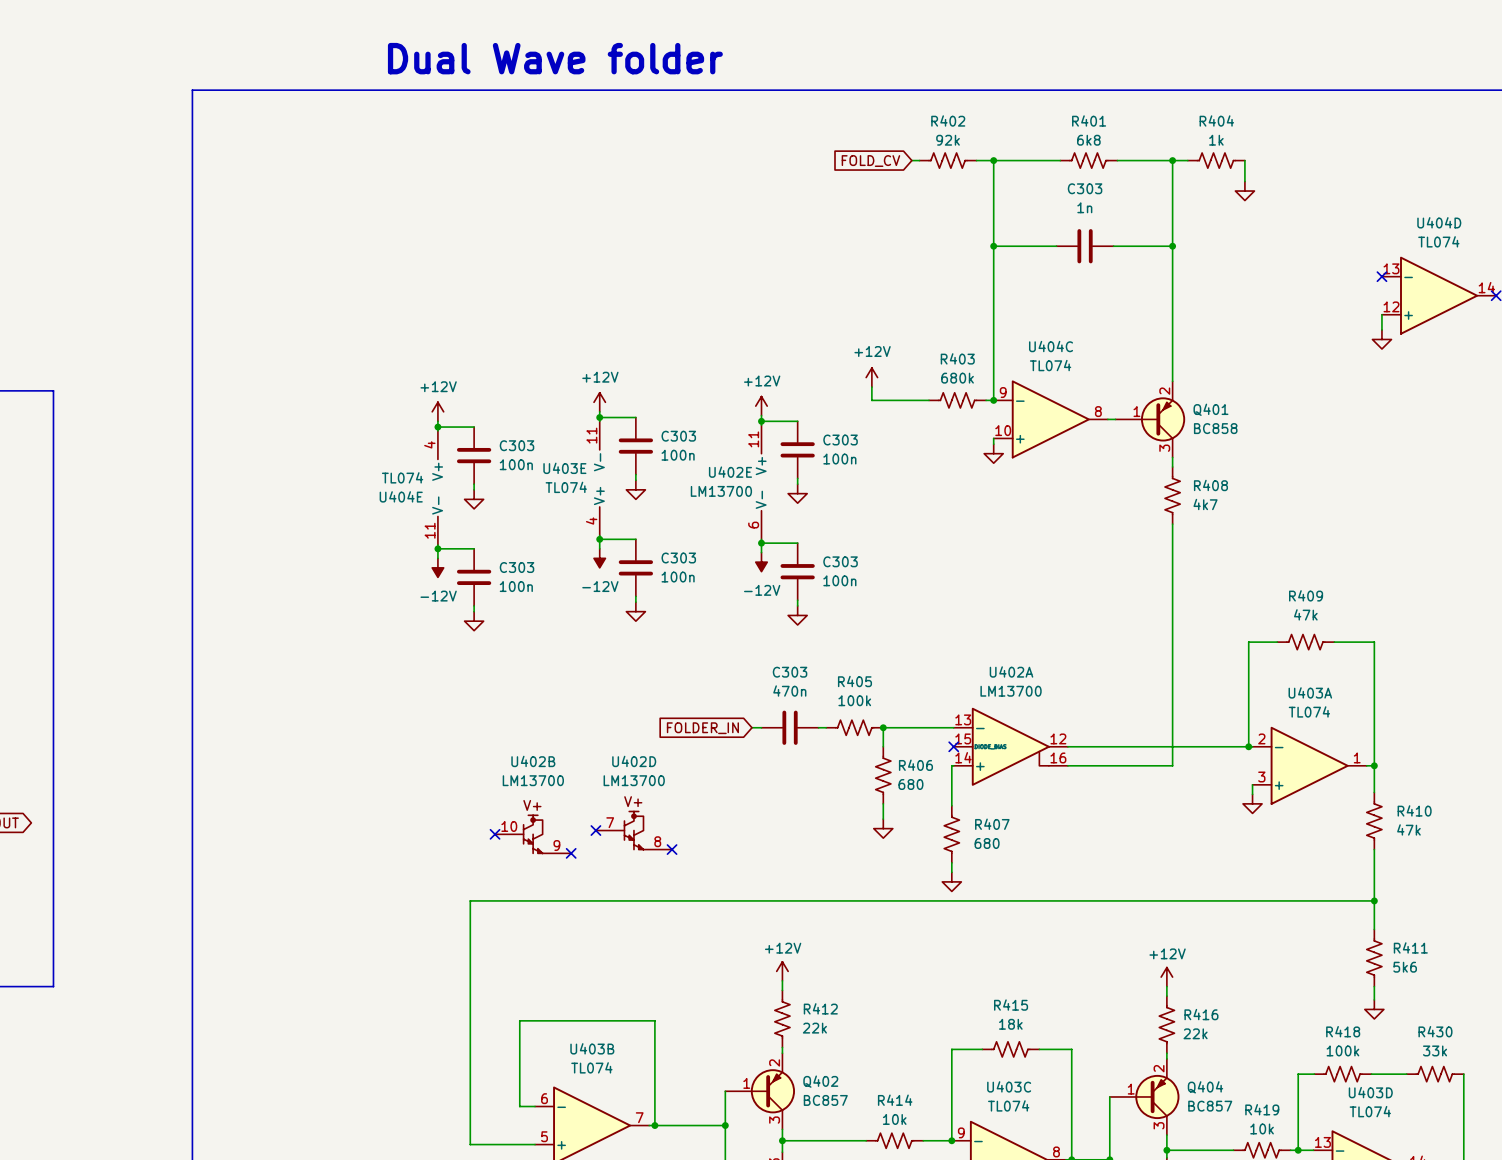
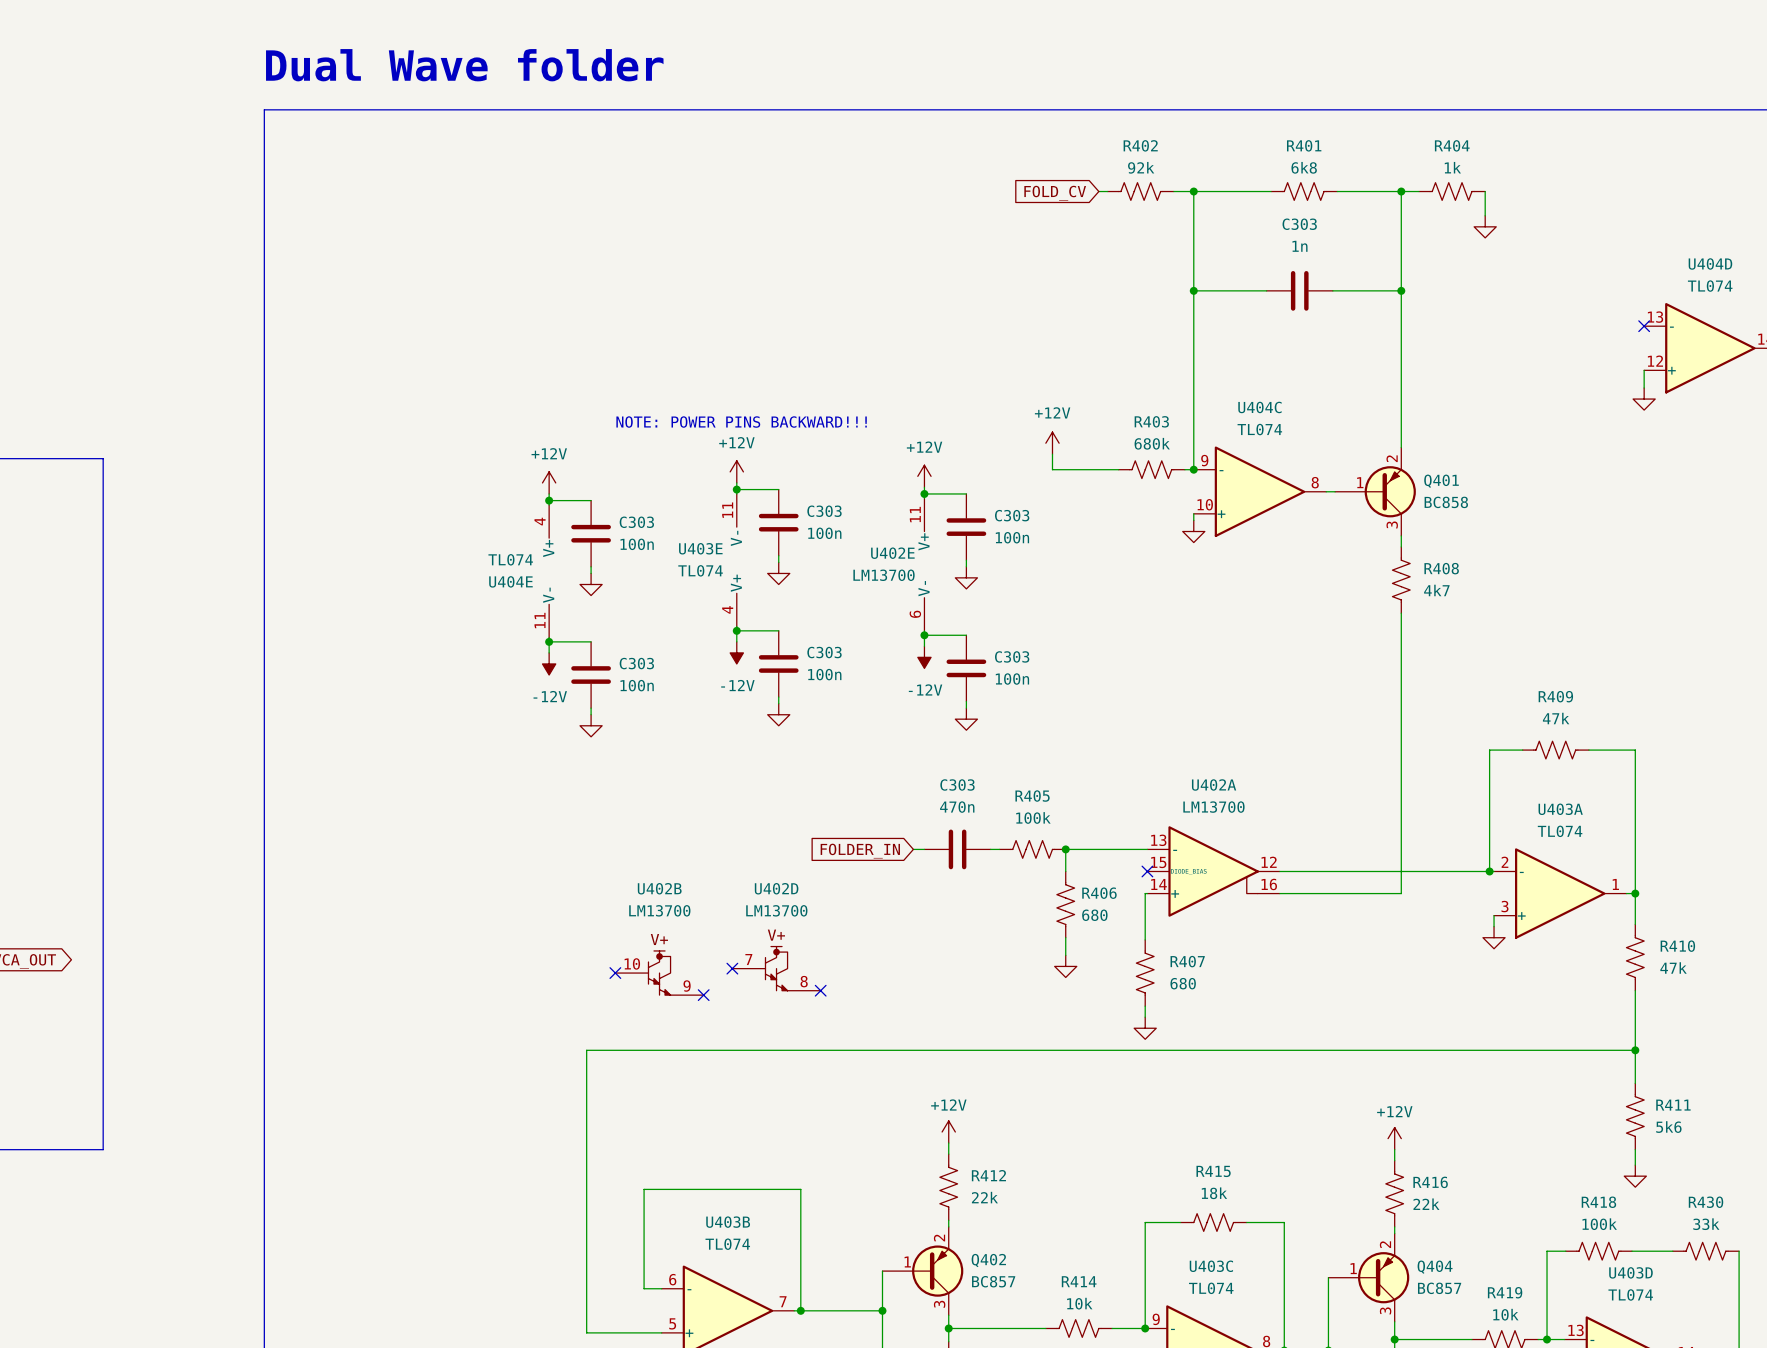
text: none -> Dual Wave folder (464, 65)
text: Dual Wave folder (555, 58) -> none
text: none -> NOTE: POWER PINS BACKWARD!!! (741, 422)

